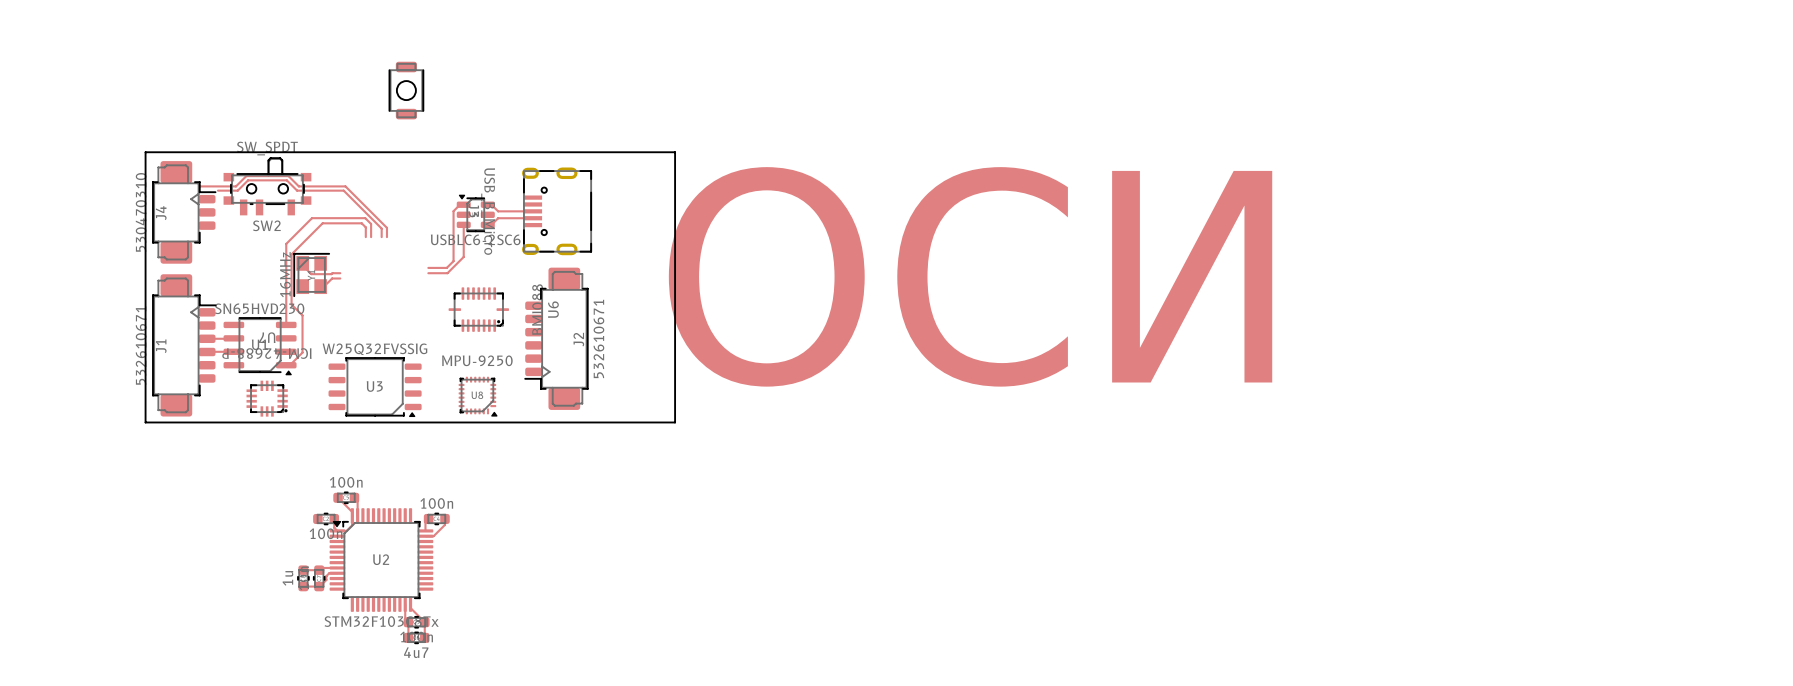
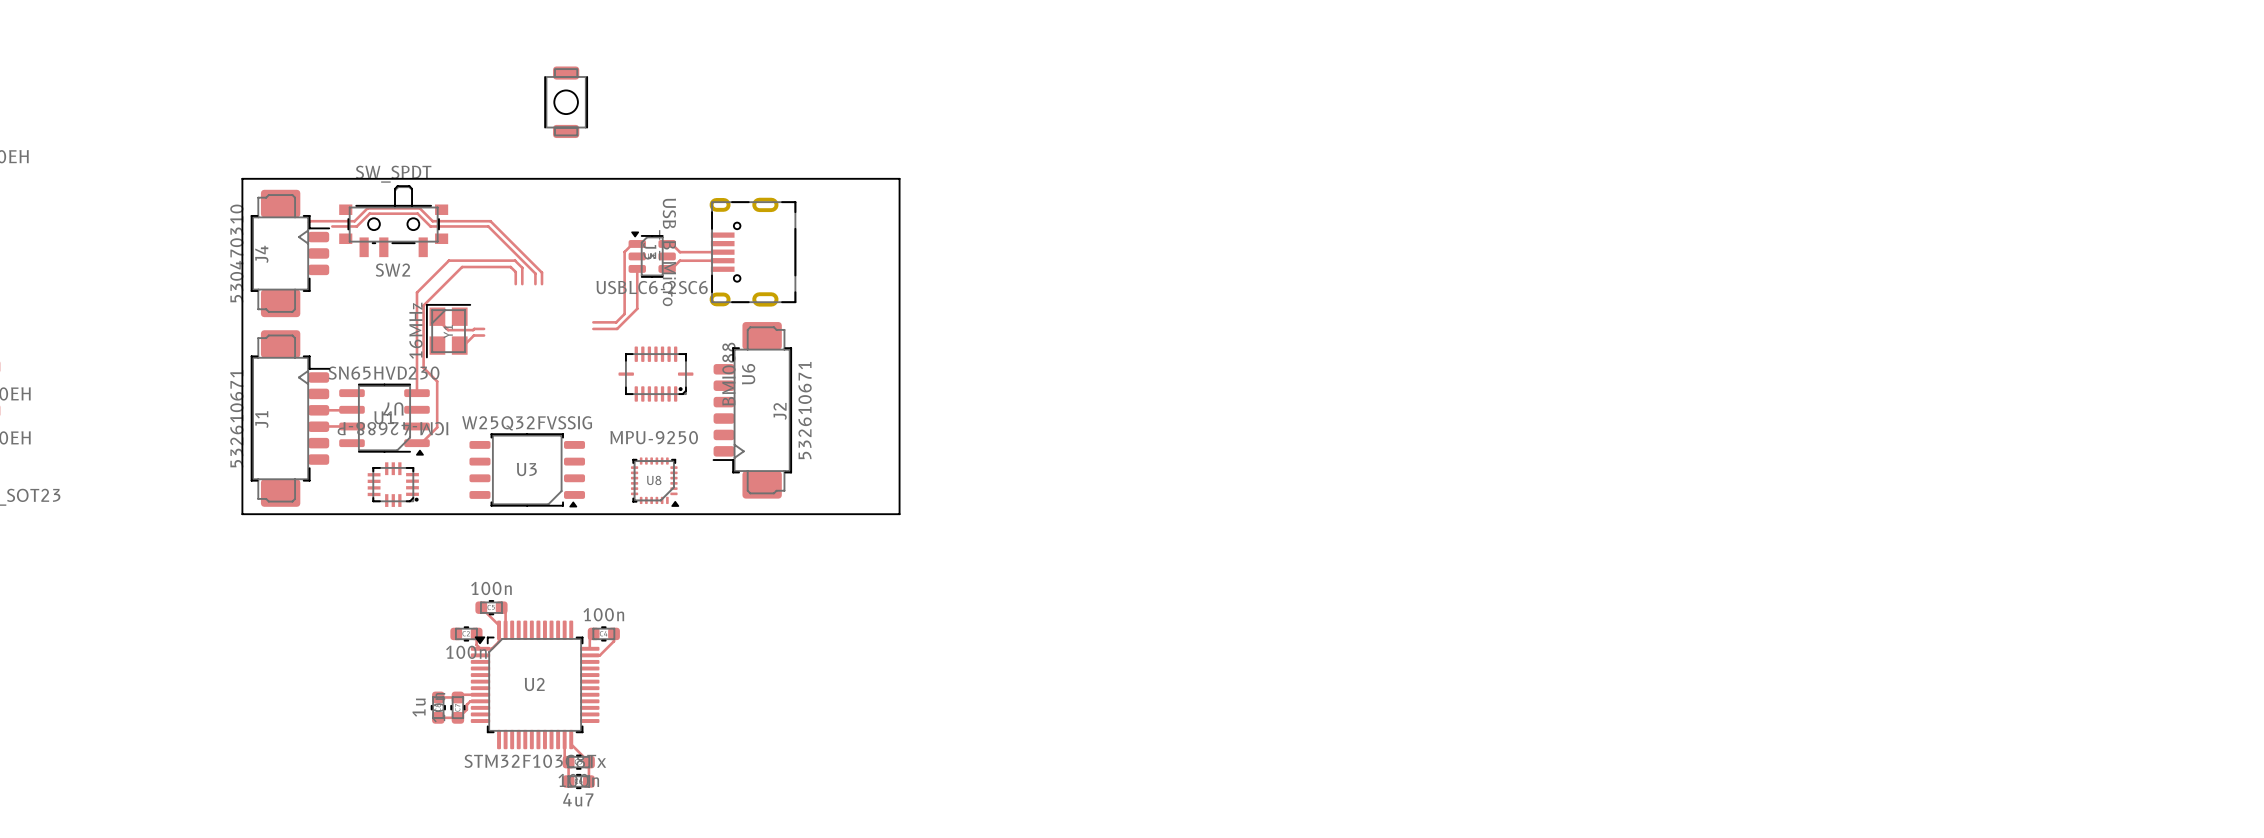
text: ОСИ (970, 276) -> none

